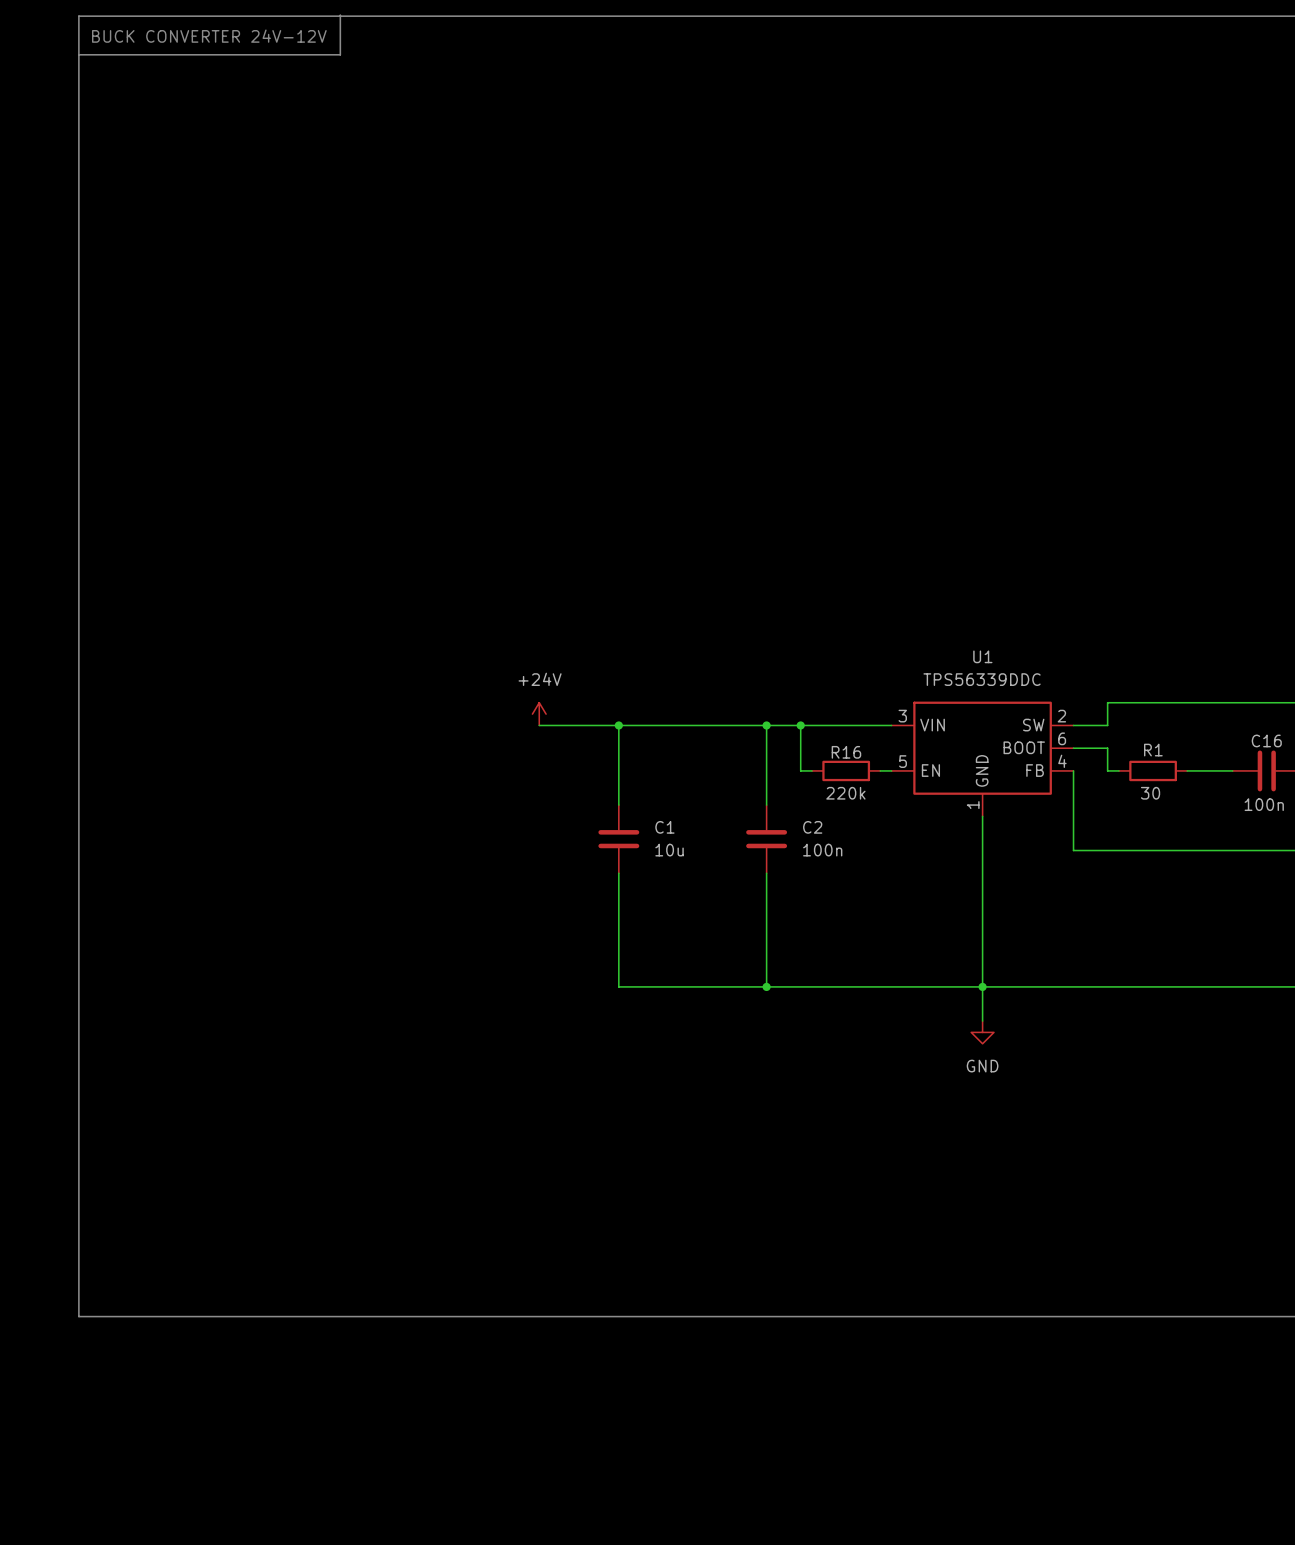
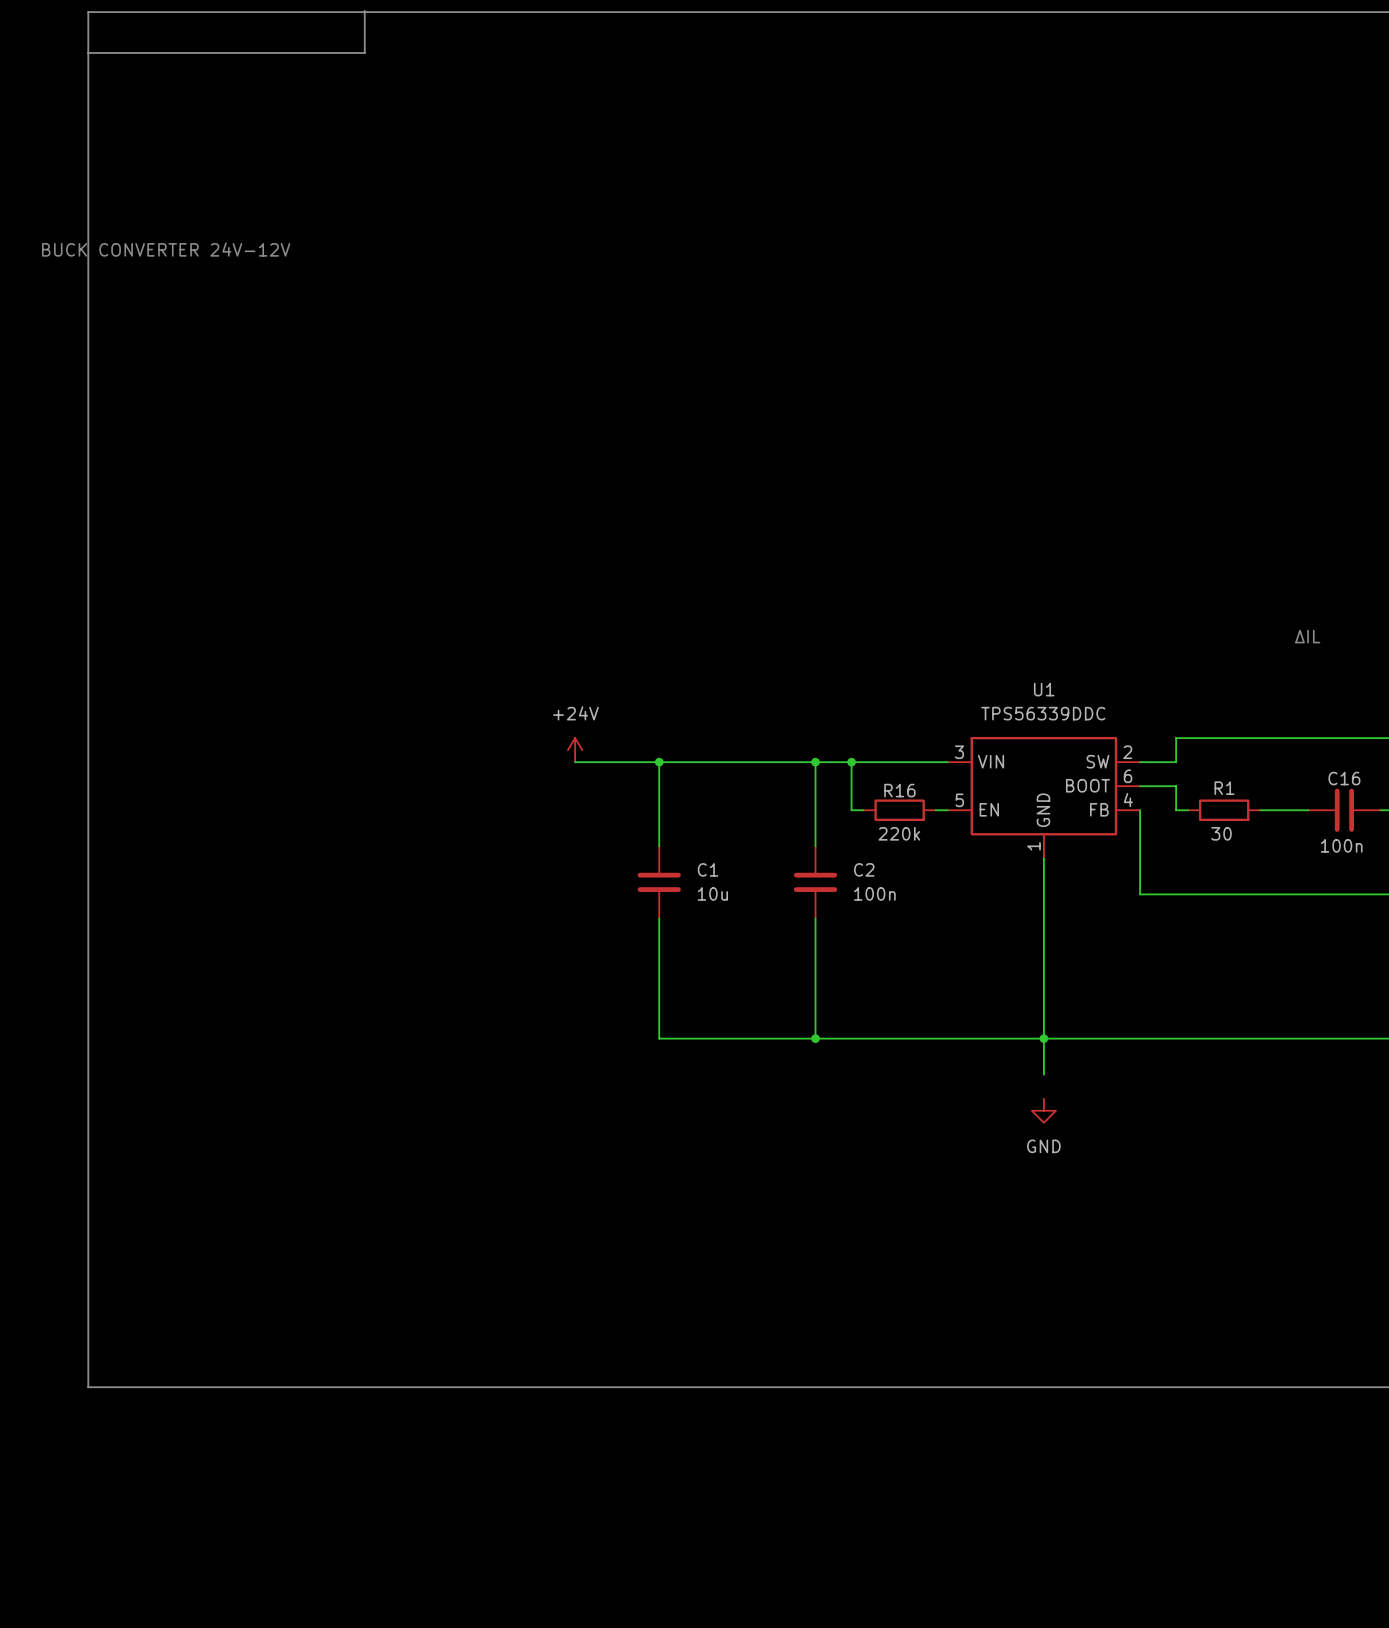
text position: BUCK CONVERTER 24V-12V (209, 36) -> BUCK CONVERTER 24V-12V (166, 249)
text: none -> ΔIL (1307, 636)
power symbol position: GND (982, 1032) -> GND (1043, 1110)

